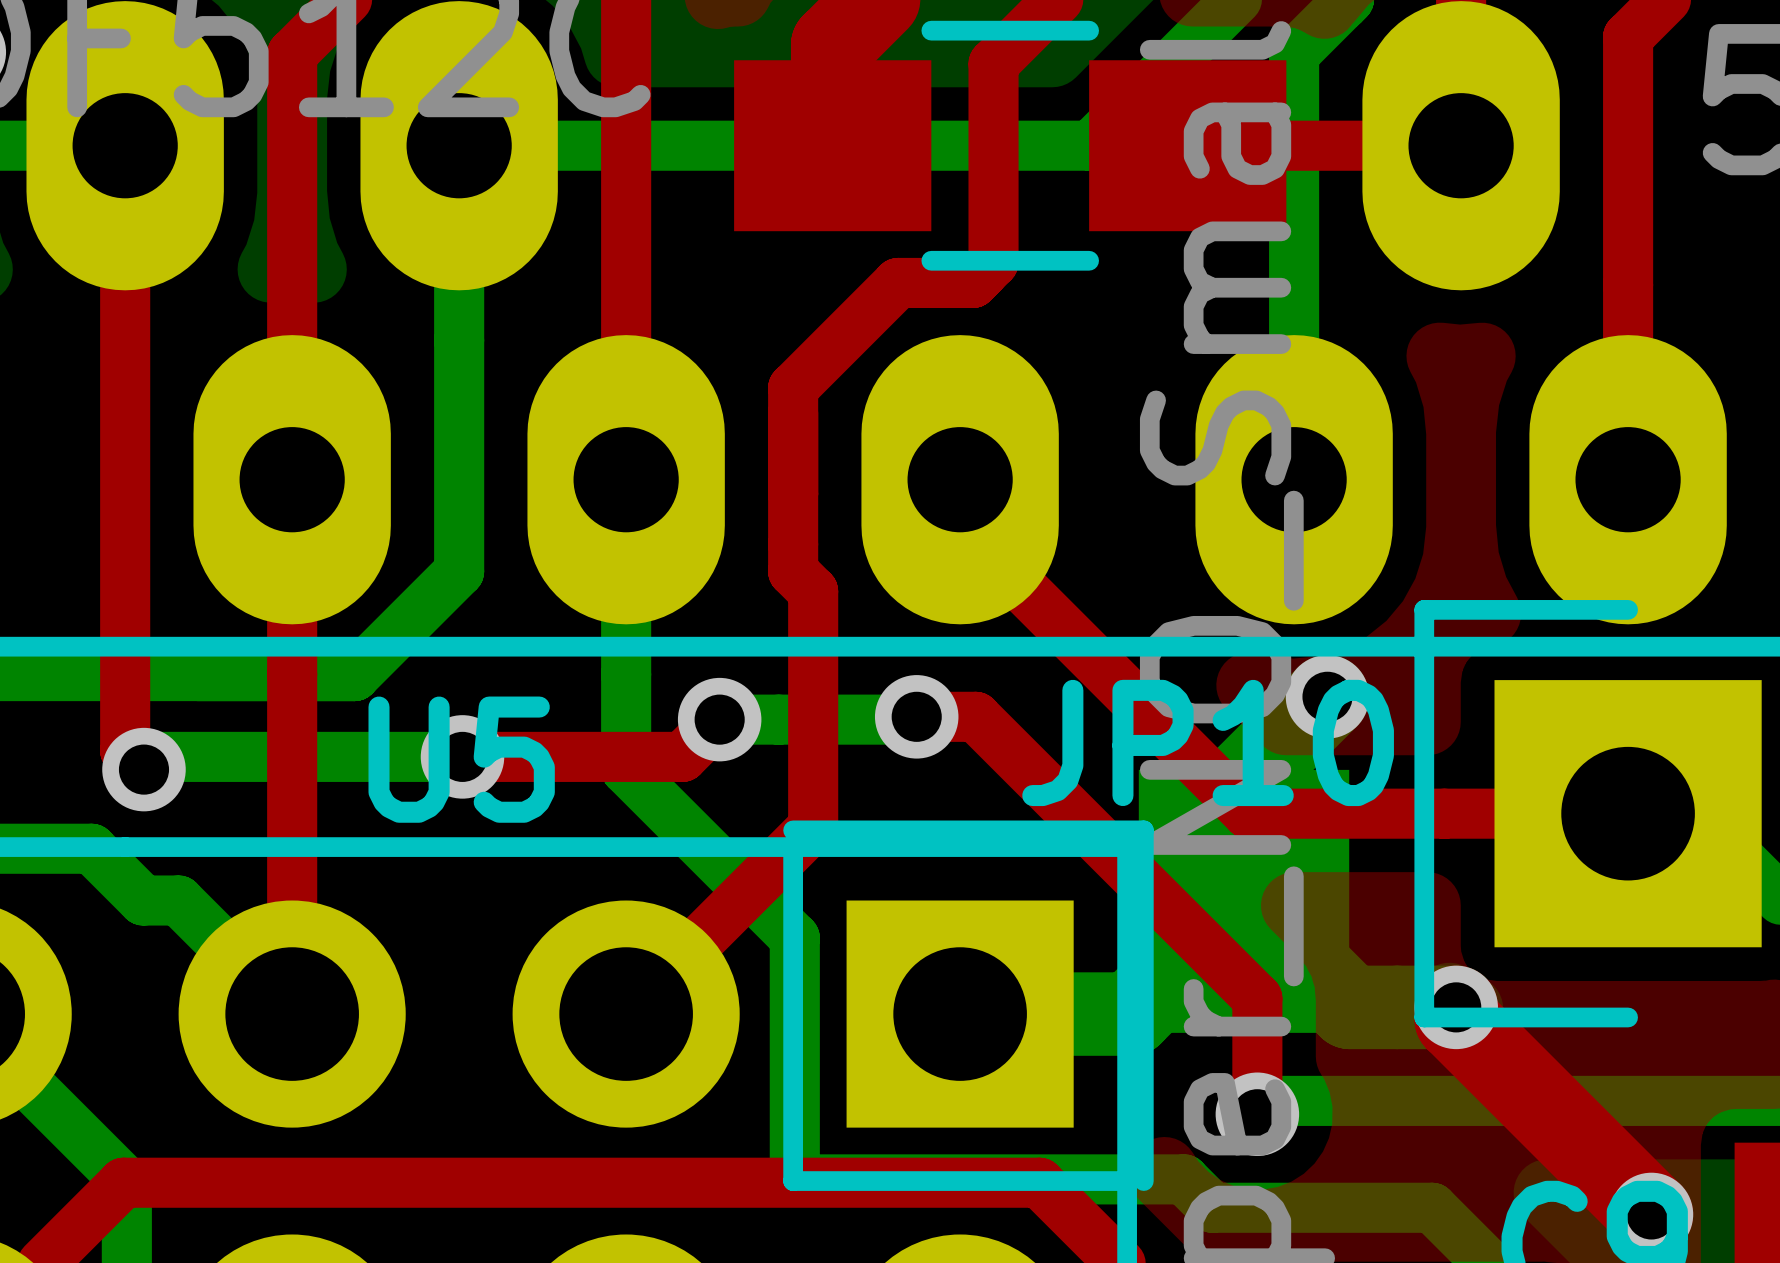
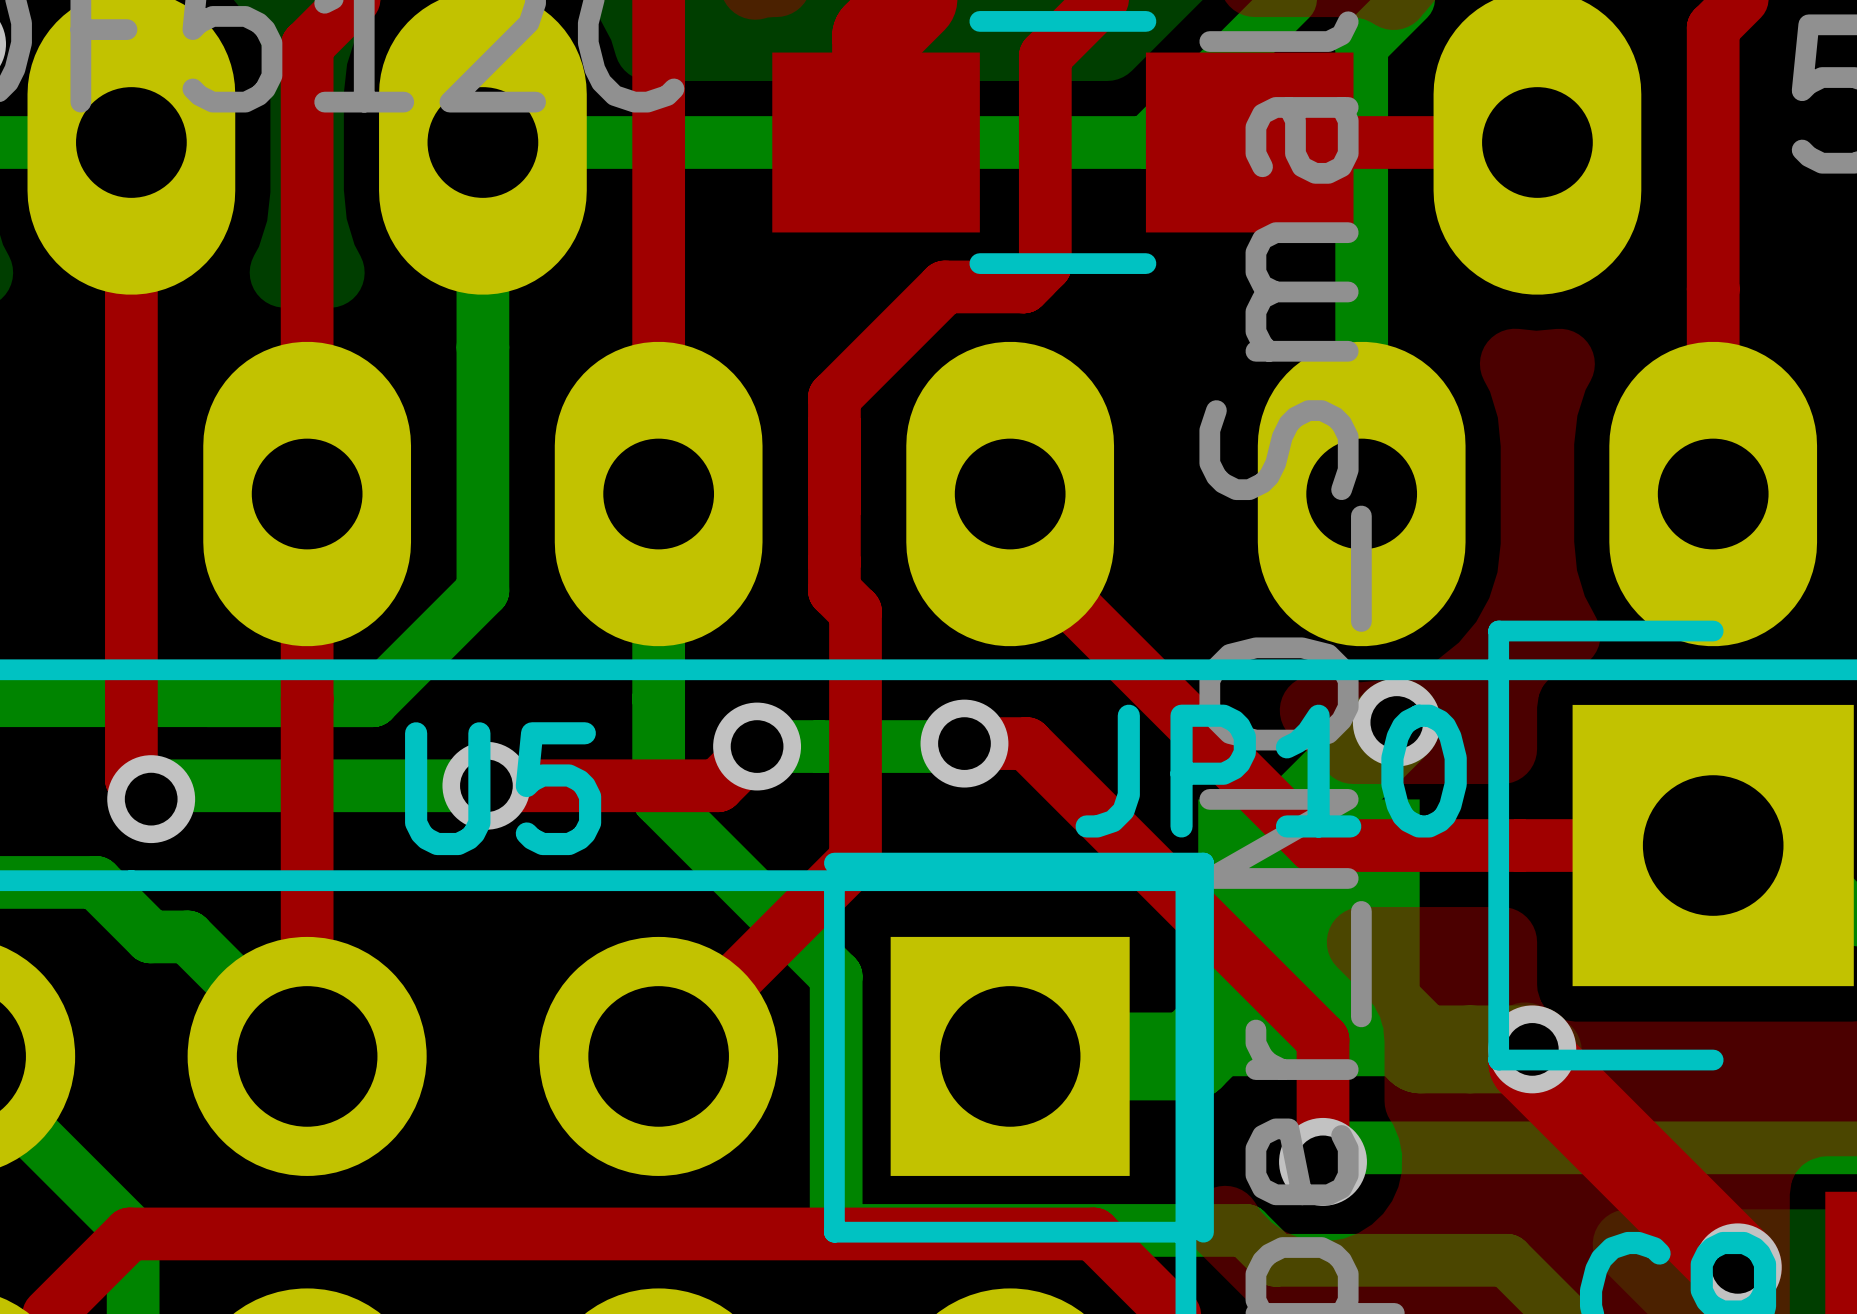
U5 name position: U5 (461, 759) -> U5 (503, 788)

